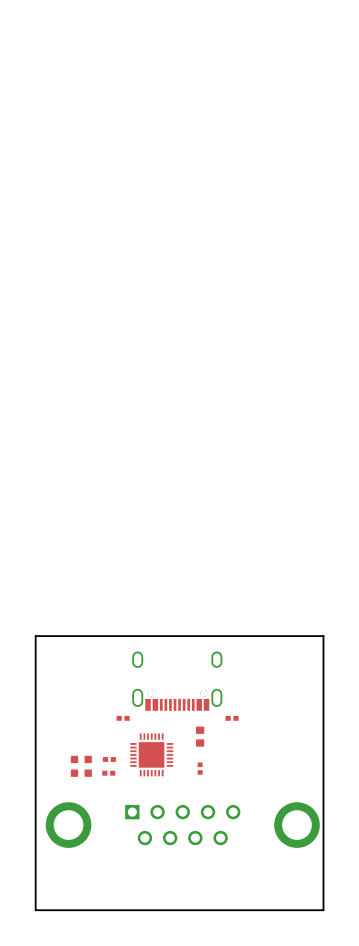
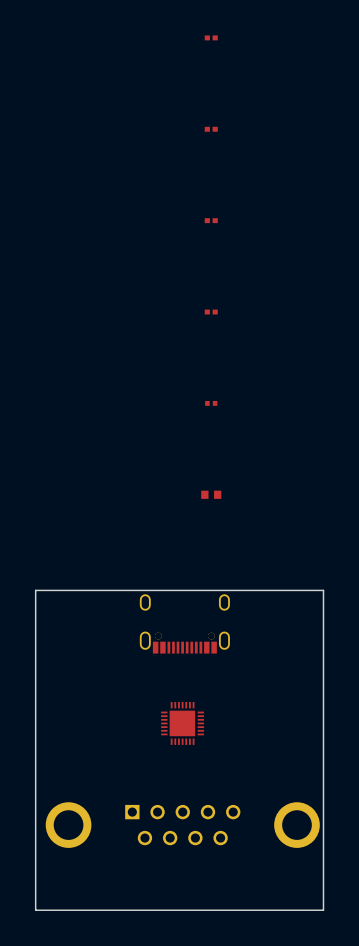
part: none -> (211, 37)
part: none -> (211, 129)
part: none -> (211, 220)
part: none -> (211, 312)
part: none -> (211, 403)
part: none -> (211, 494)
part: none -> (184, 623)
board edge: (323, 636) (35, 636) -> (323, 636) (323, 590) (35, 590) (35, 636)
part: (177, 681) -> none
part: (123, 718) -> none
part: (232, 718) -> none
part: (200, 736) -> none
part position: (151, 754) -> (182, 723)
part: (81, 759) -> none
part: (109, 759) -> none
part: (200, 768) -> none
part: (81, 773) -> none
part: (108, 773) -> none

